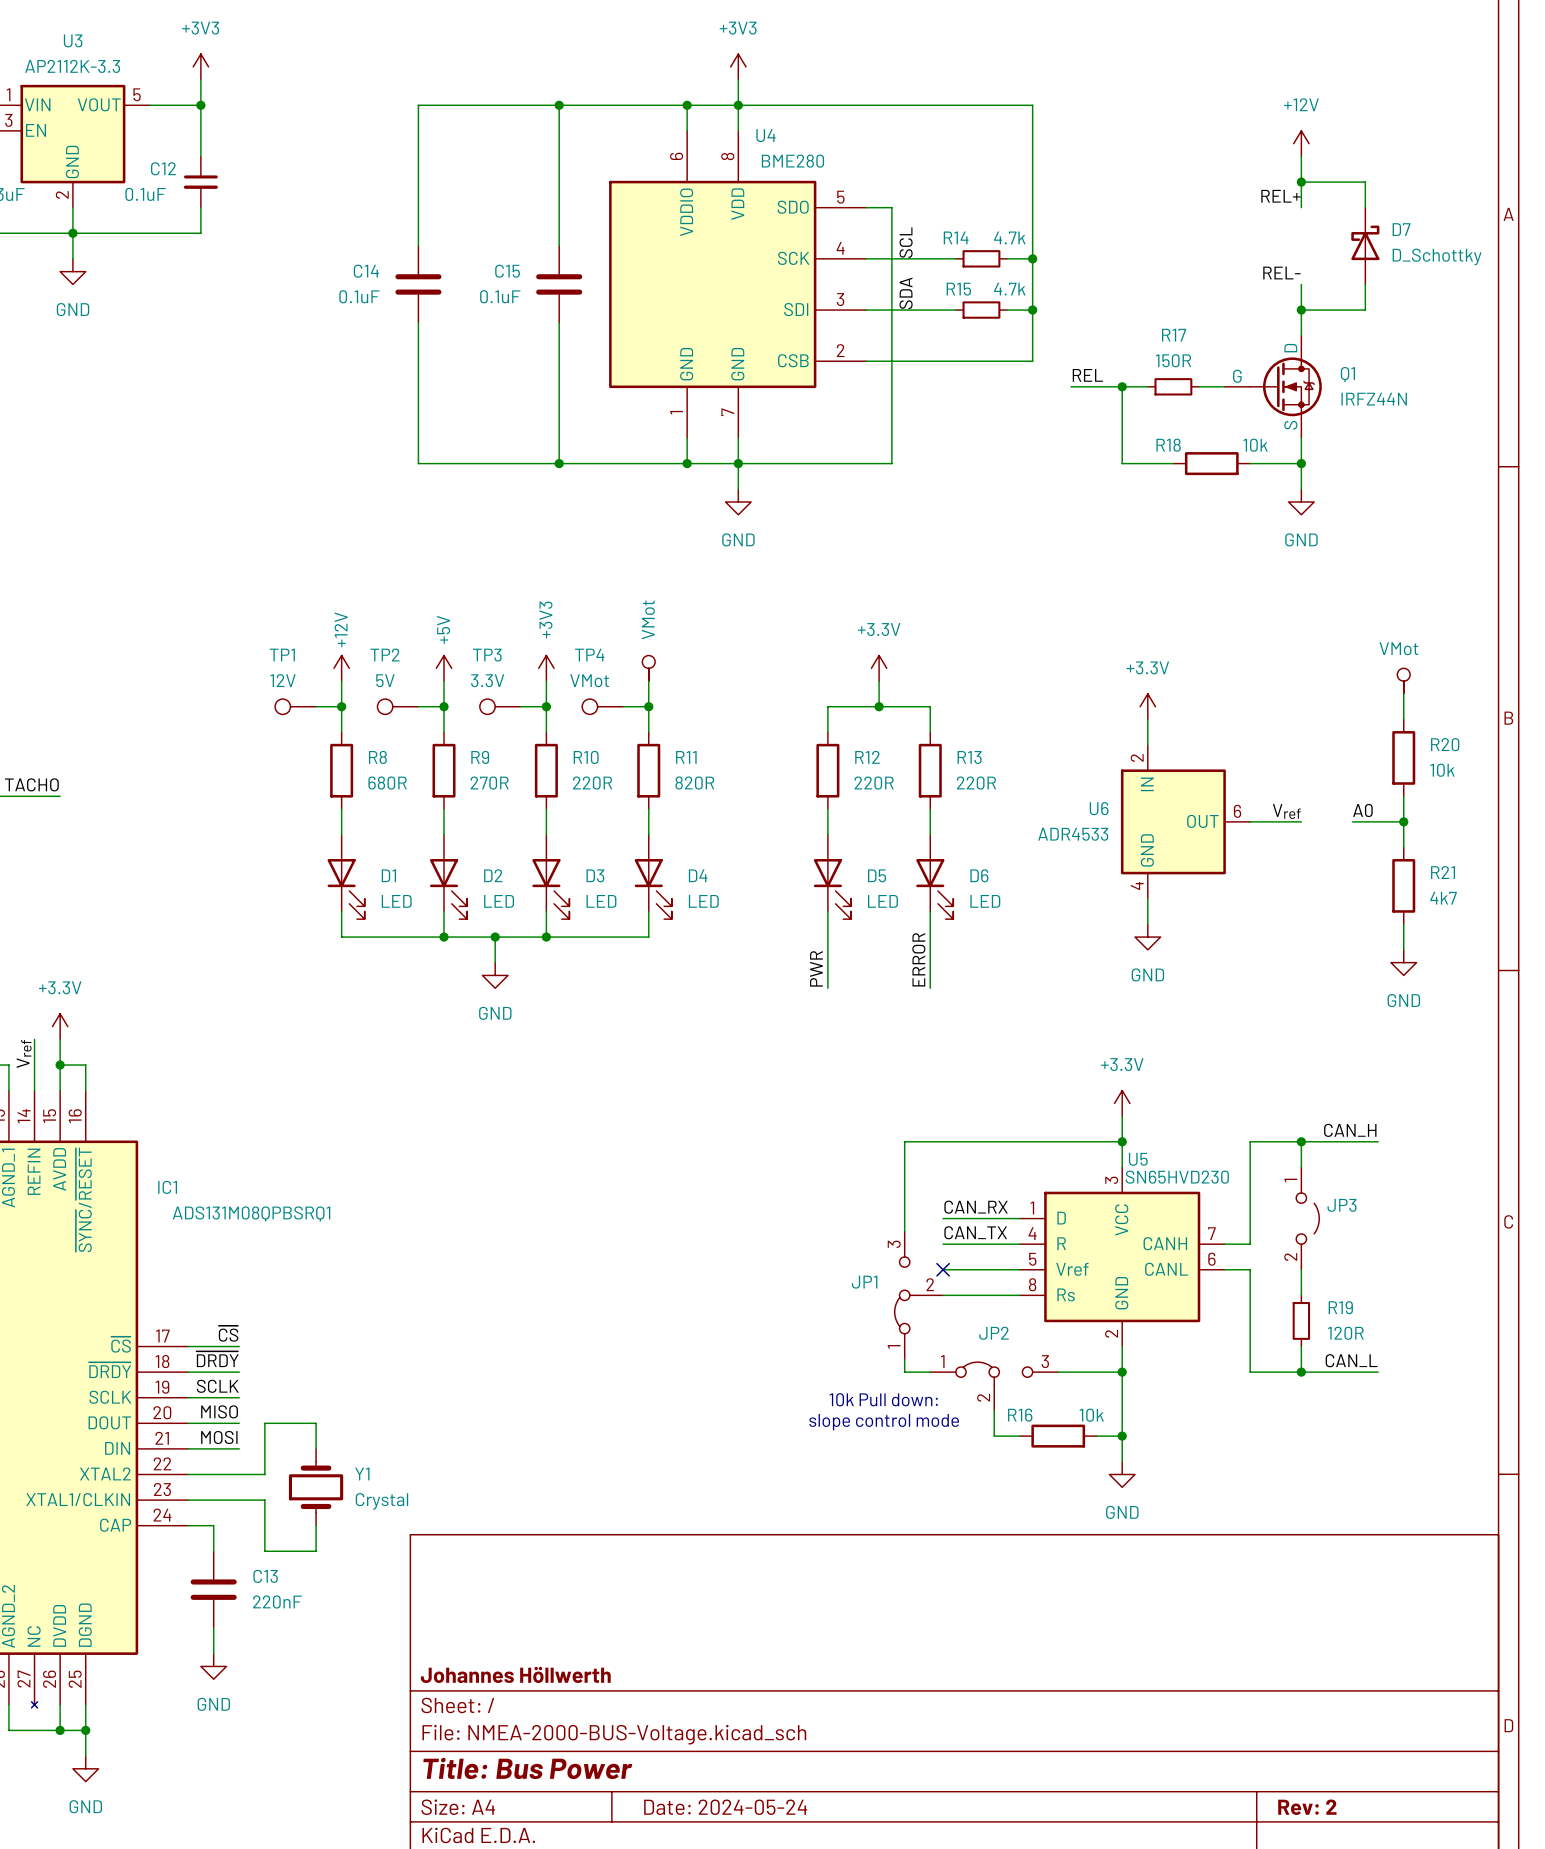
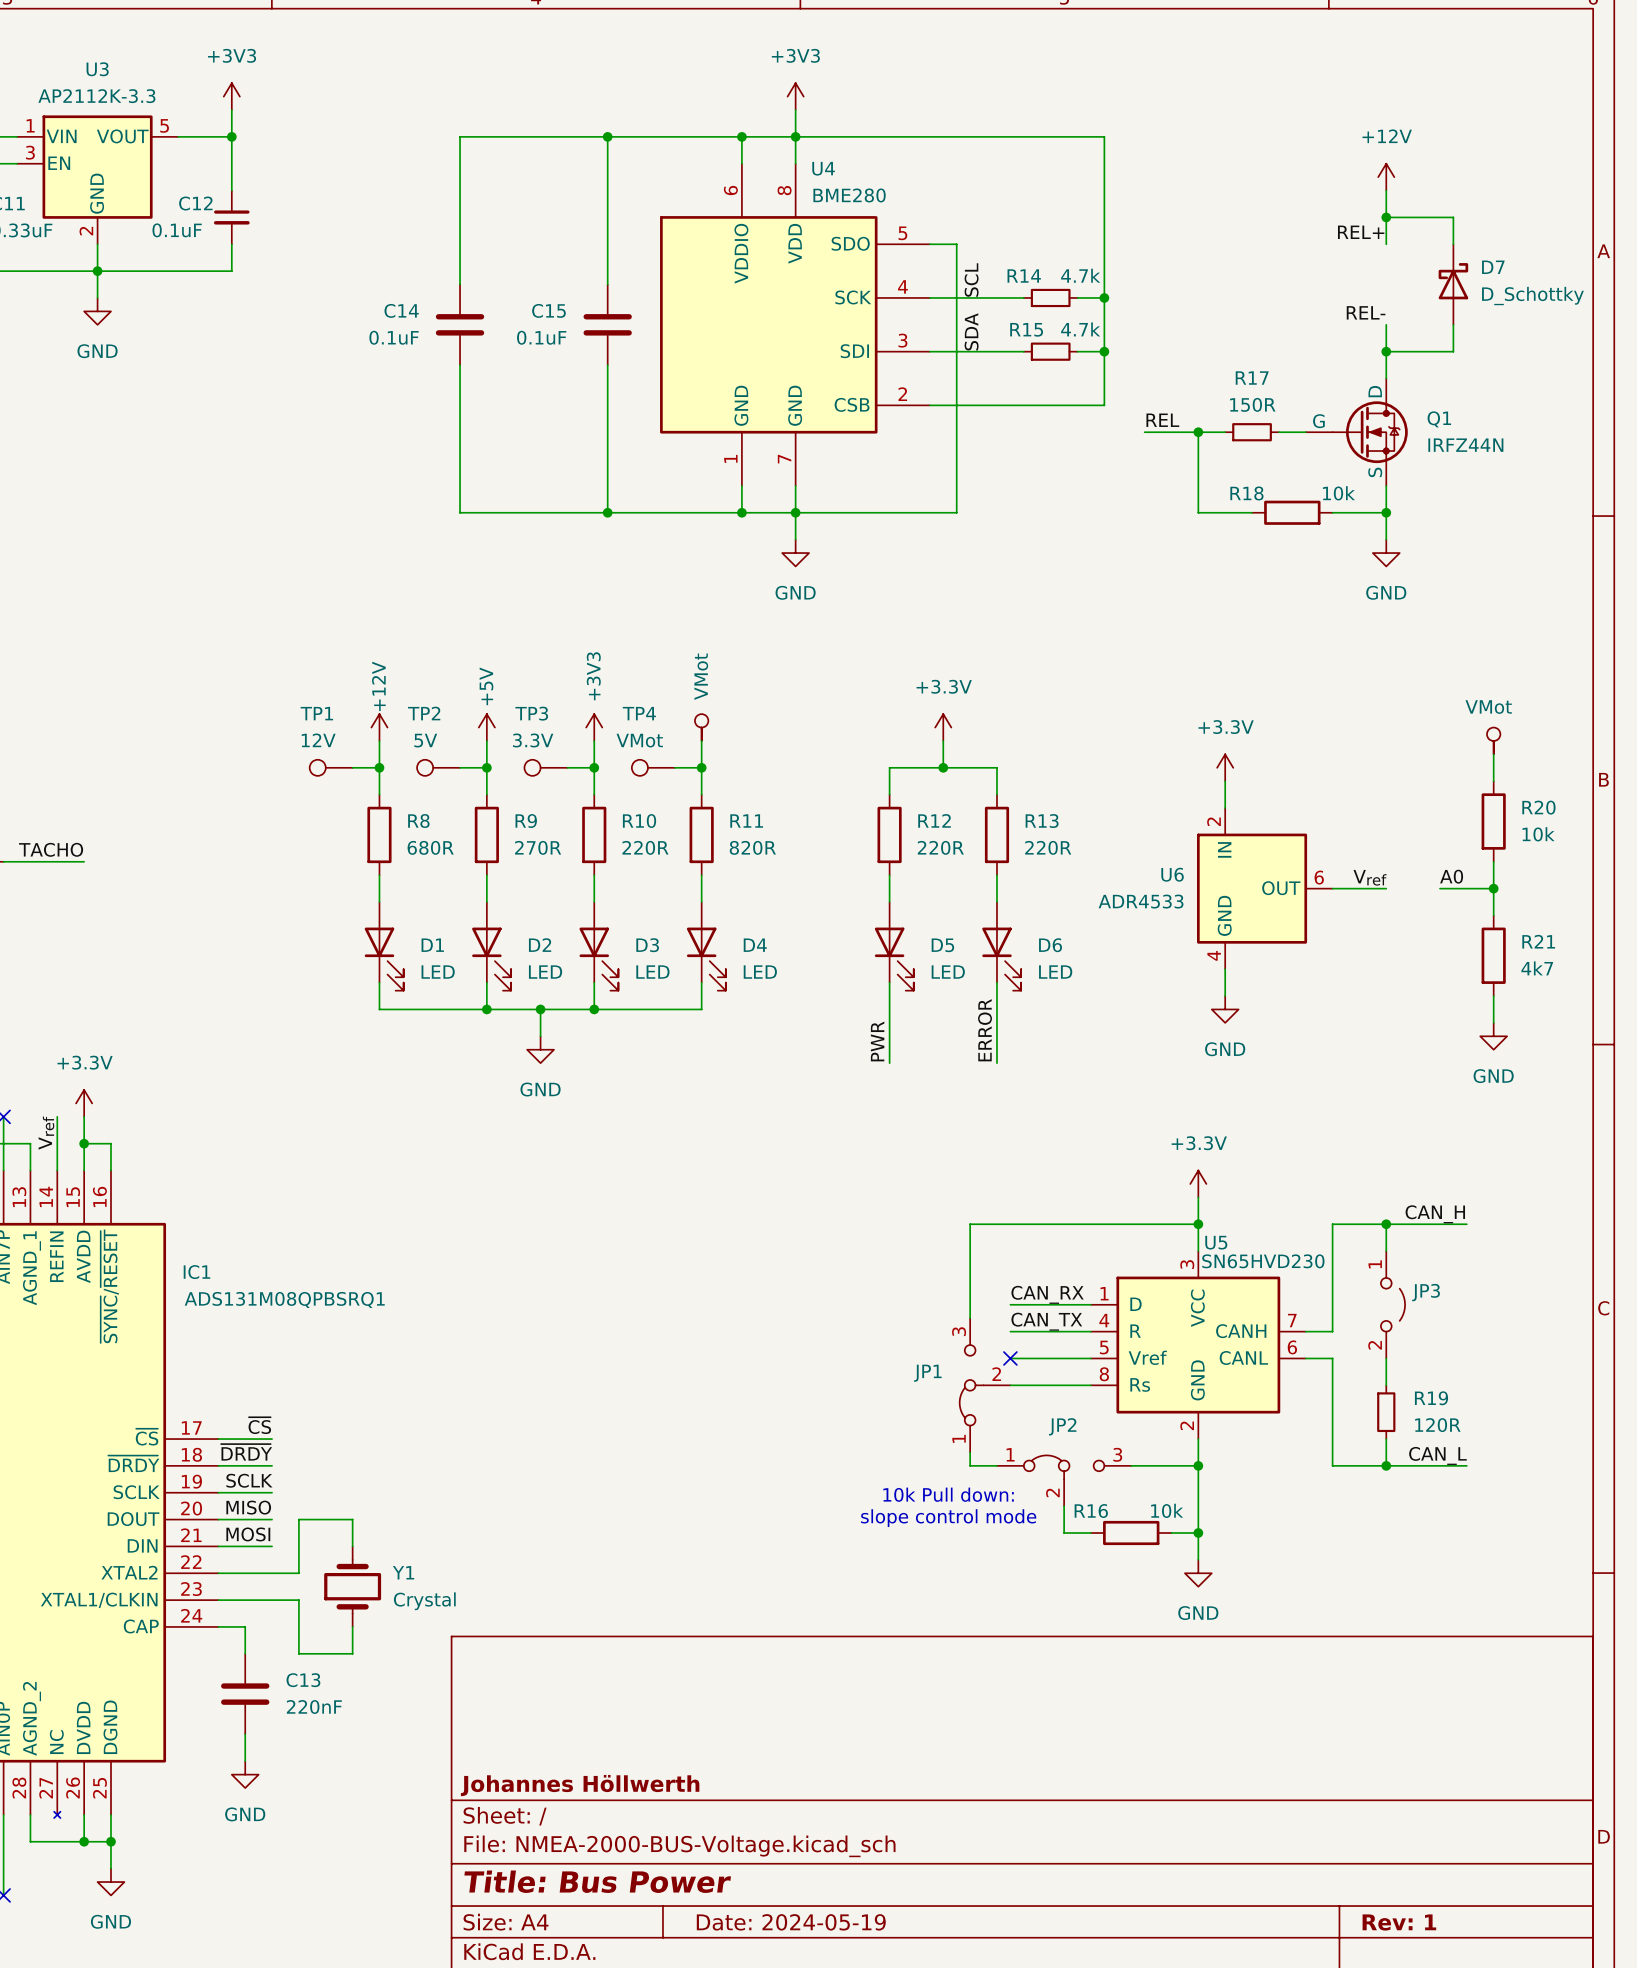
title block: Date: 2024-05-24 (725, 1807) -> Date: 2024-05-19 (791, 1922)
title block: Rev: 2 (1307, 1807) -> Rev: 1 (1399, 1922)

